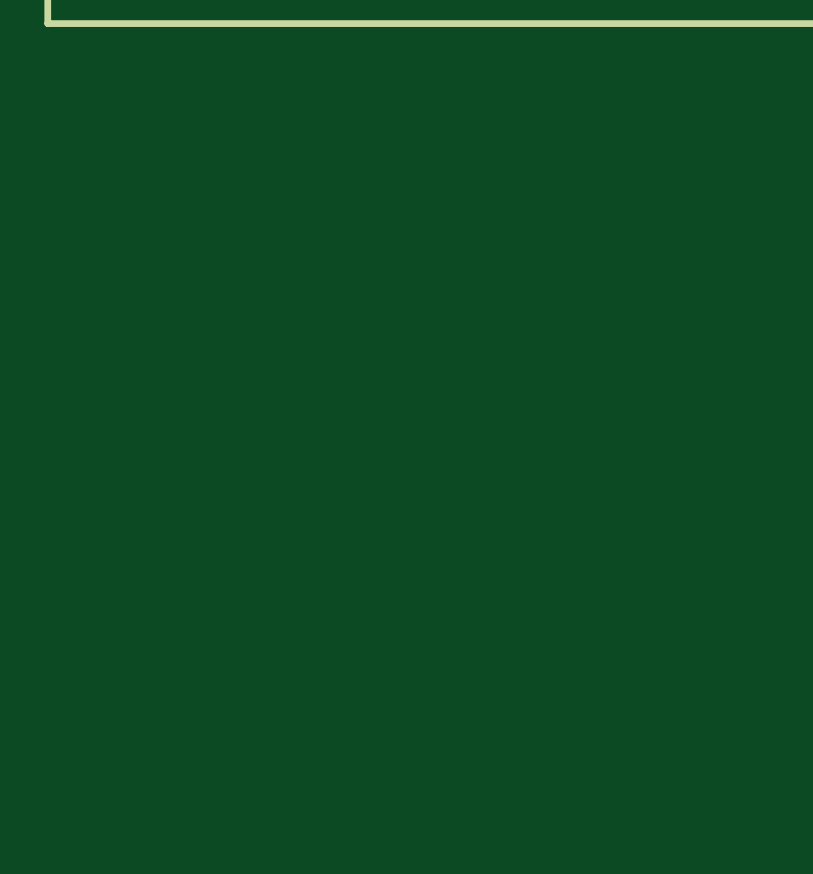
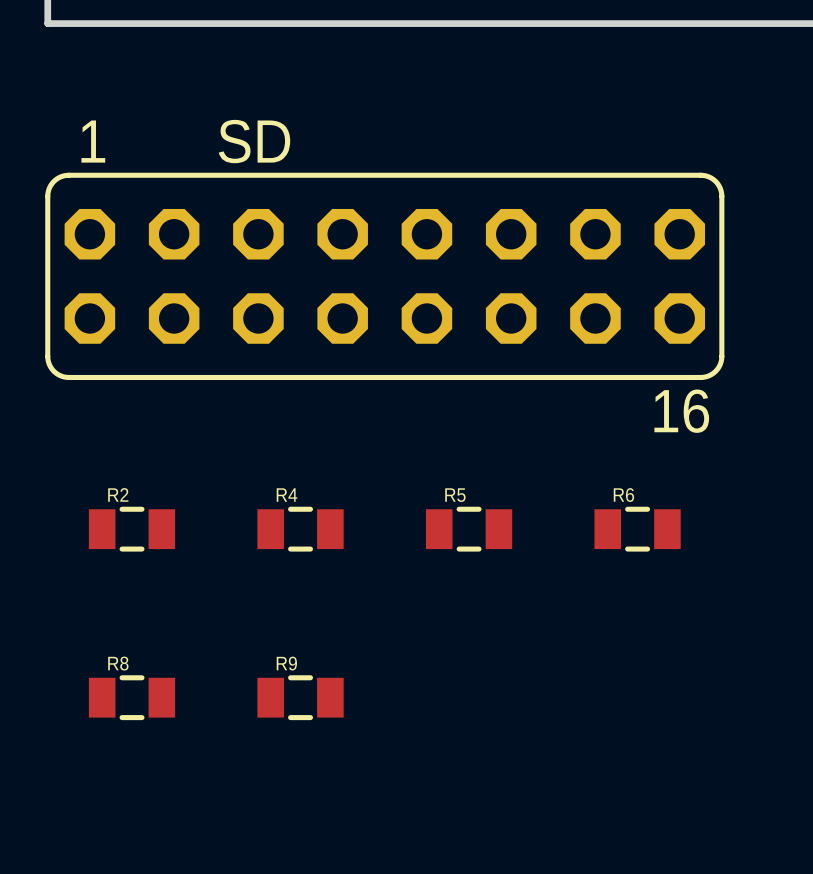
SD: none -> (384, 276)
R2: none -> (132, 529)
R4: none -> (300, 529)
R5: none -> (469, 529)
R6: none -> (637, 529)
R8: none -> (132, 697)
R9: none -> (300, 697)

